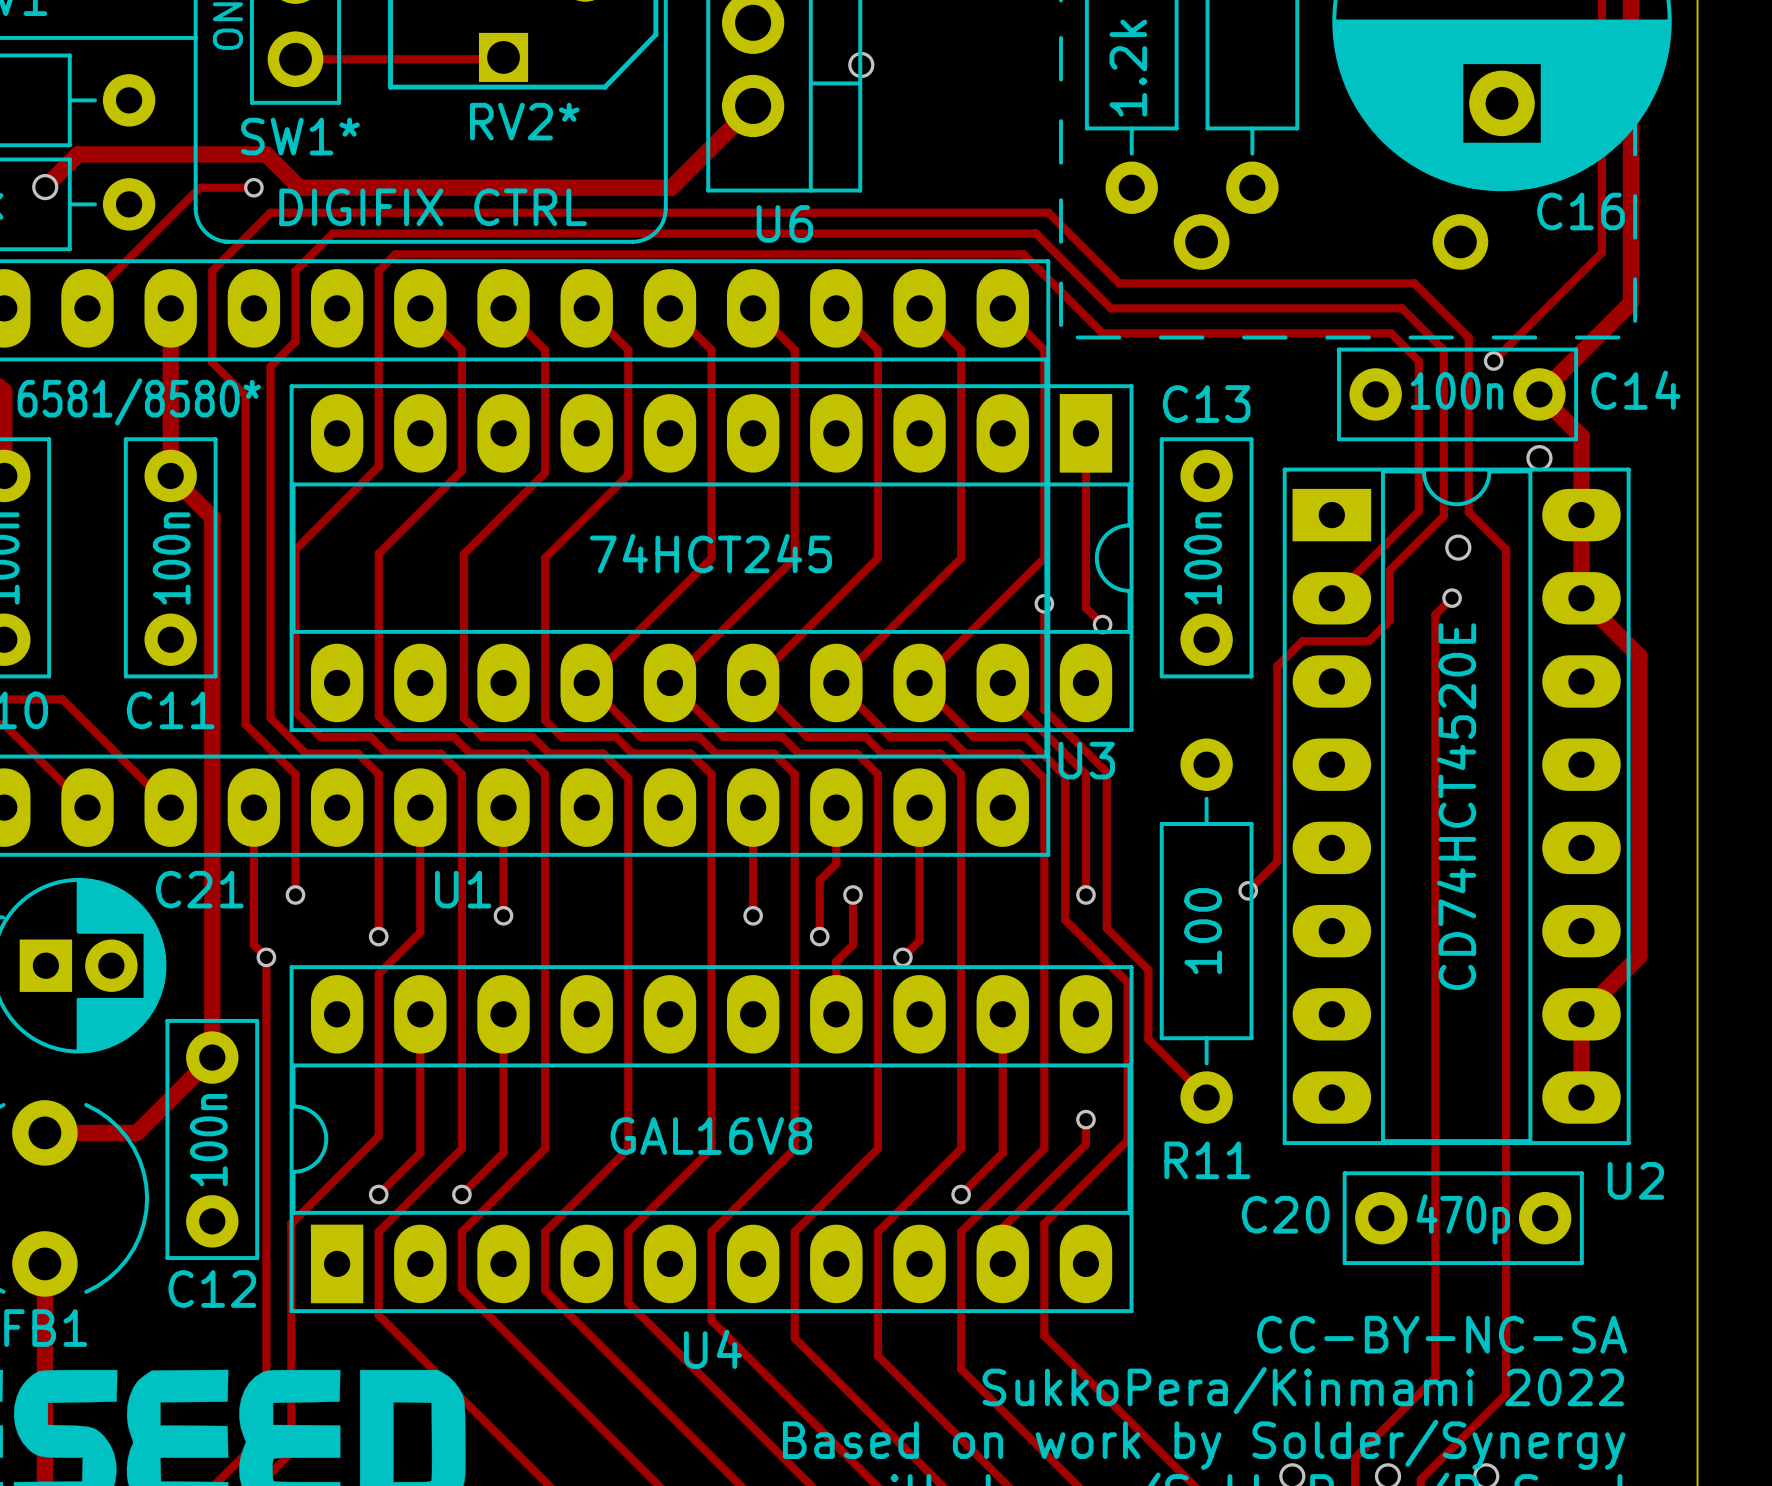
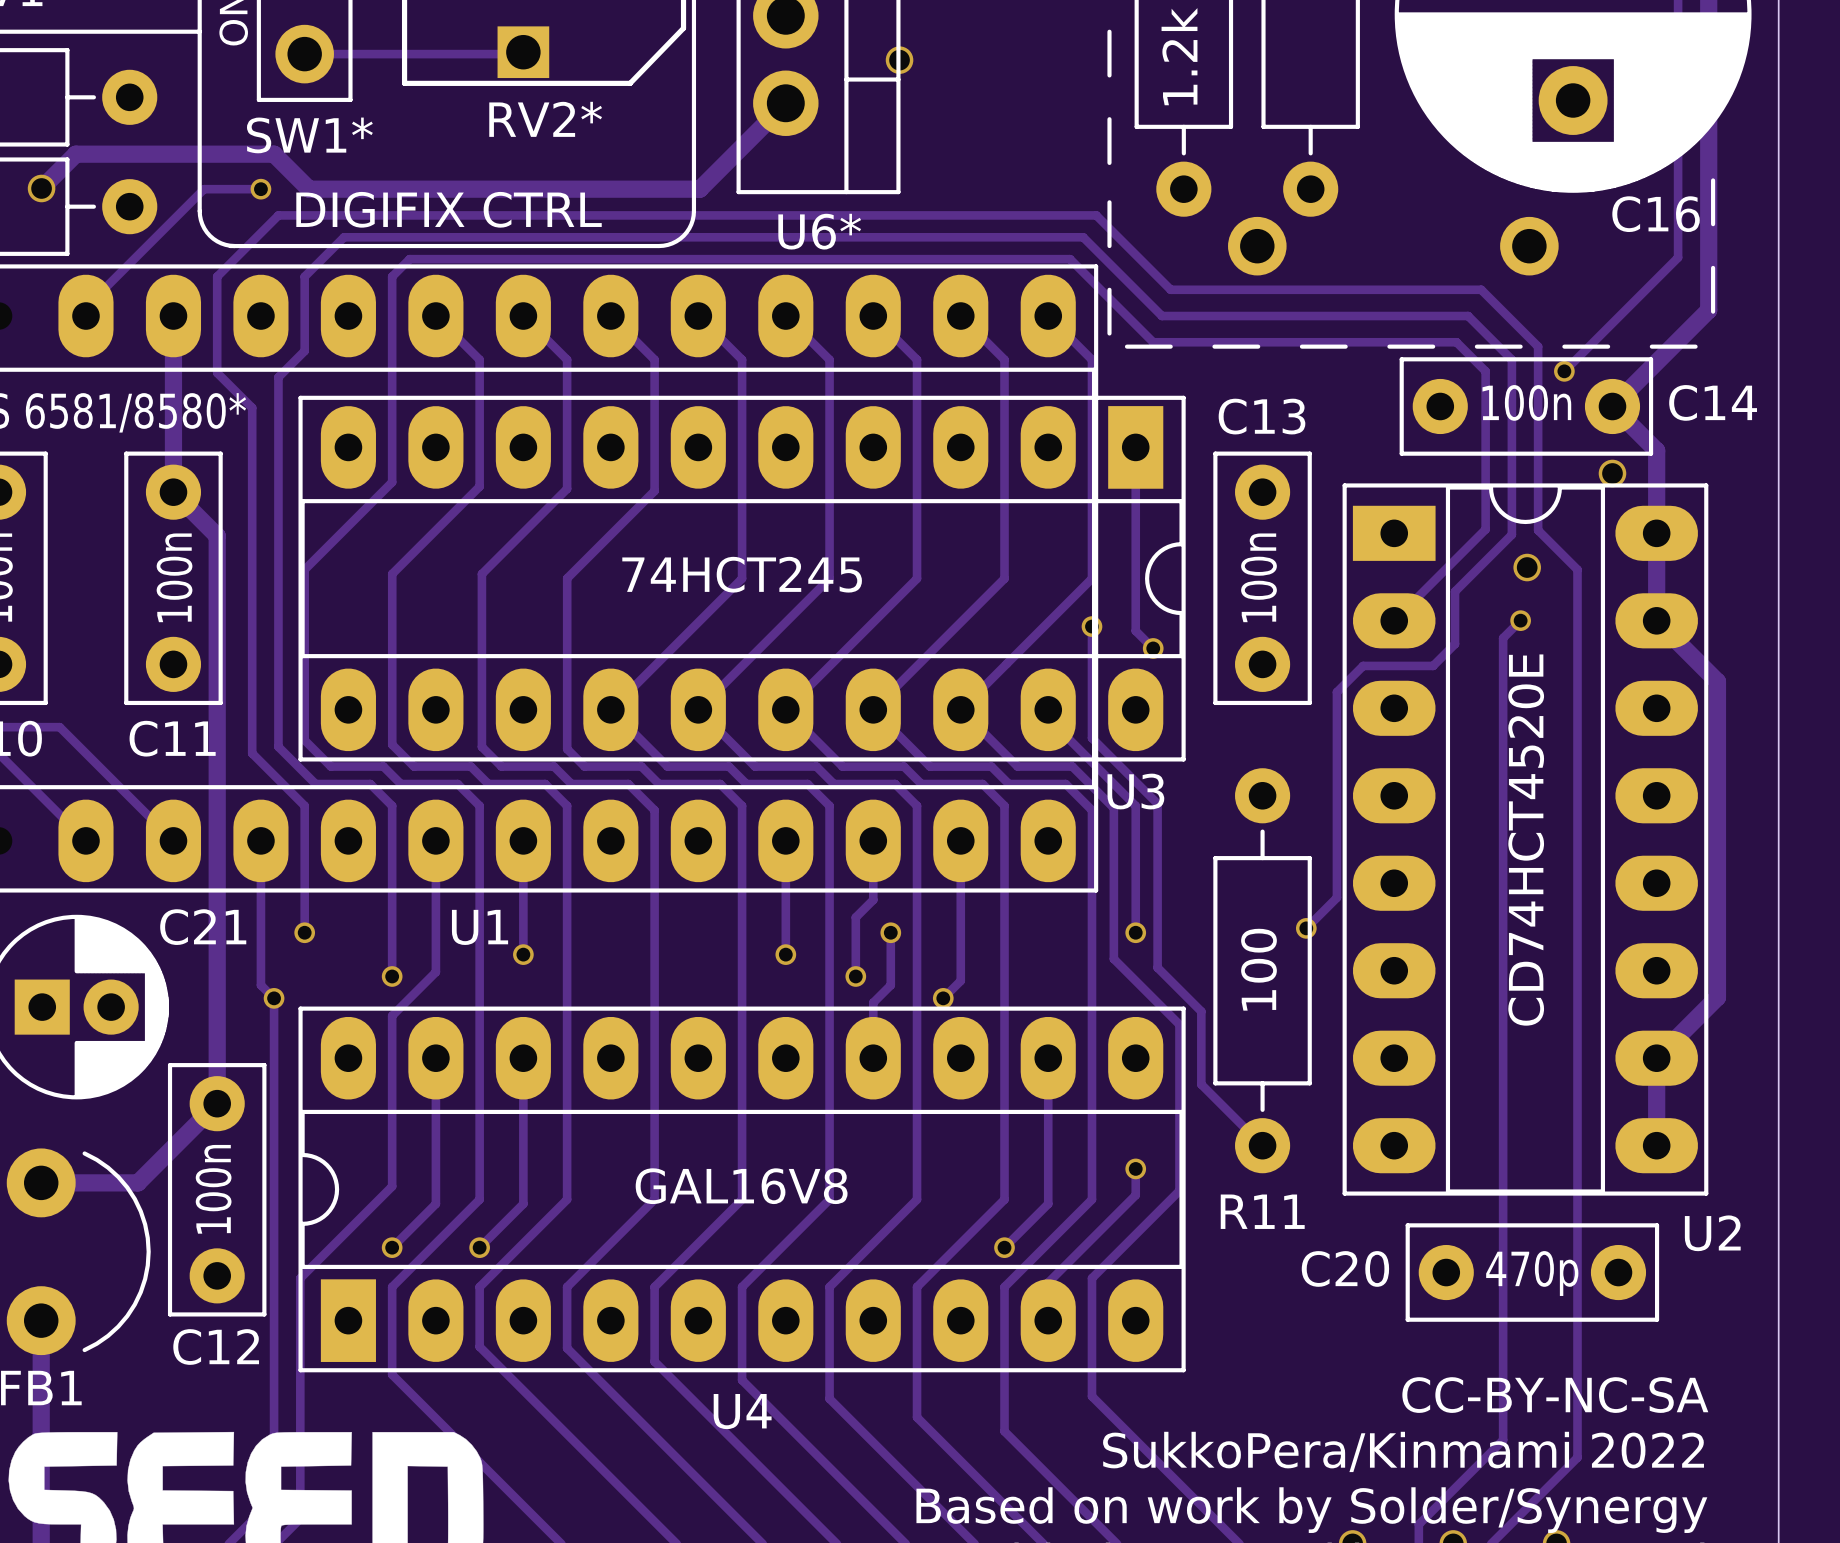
line: (1635, 112) (1635, 154) -> none
line: (1635, 221) (1635, 237) -> (1713, 267) (1713, 285)
U6 name: U6 (784, 223) -> none
text: none -> U6* (819, 231)
line: (1635, 304) (1635, 320) -> (1713, 180) (1713, 197)

